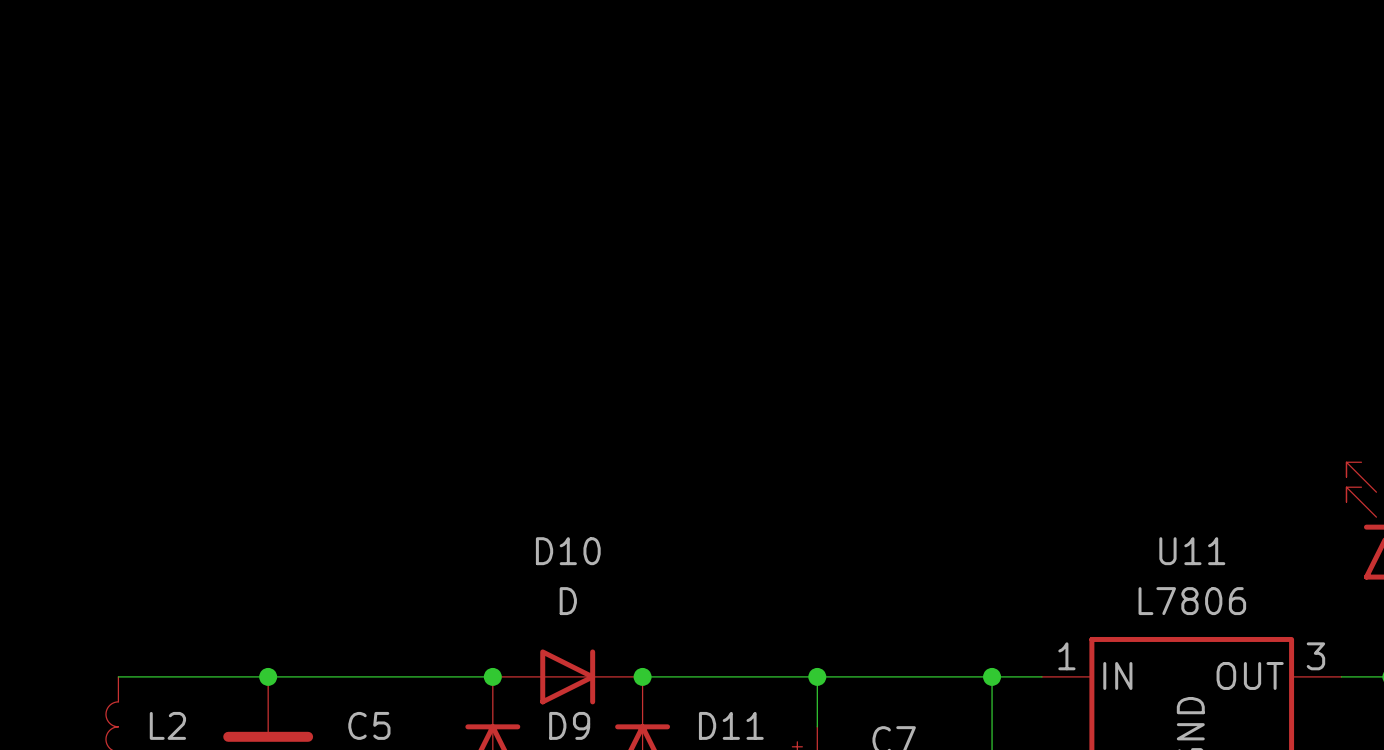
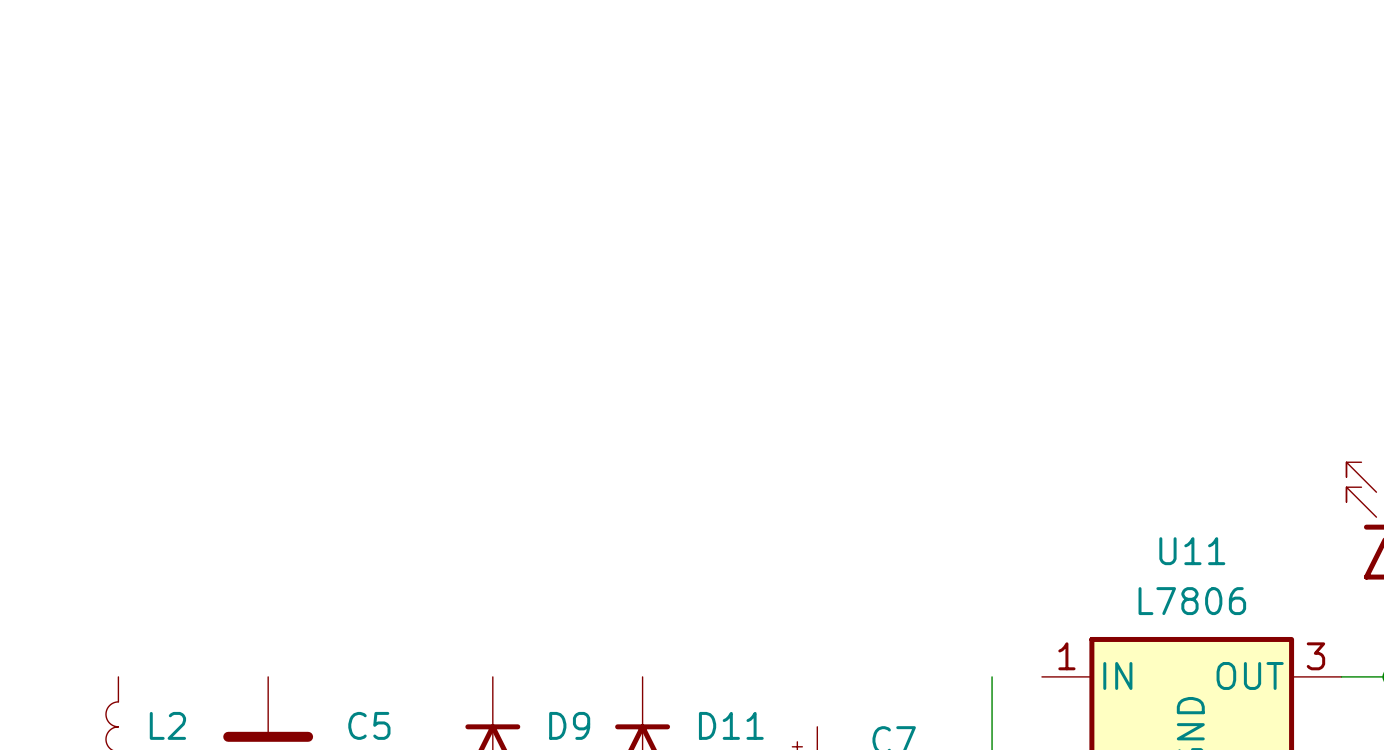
wire: (118, 676) (492, 676) -> none
junction: (268, 676) -> none
junction: (492, 676) -> none
D10: D (567, 676) -> none
wire: (642, 676) (1041, 676) -> none
junction: (642, 676) -> none
wire: (817, 676) (817, 726) -> none
junction: (817, 676) -> none
junction: (992, 676) -> none

